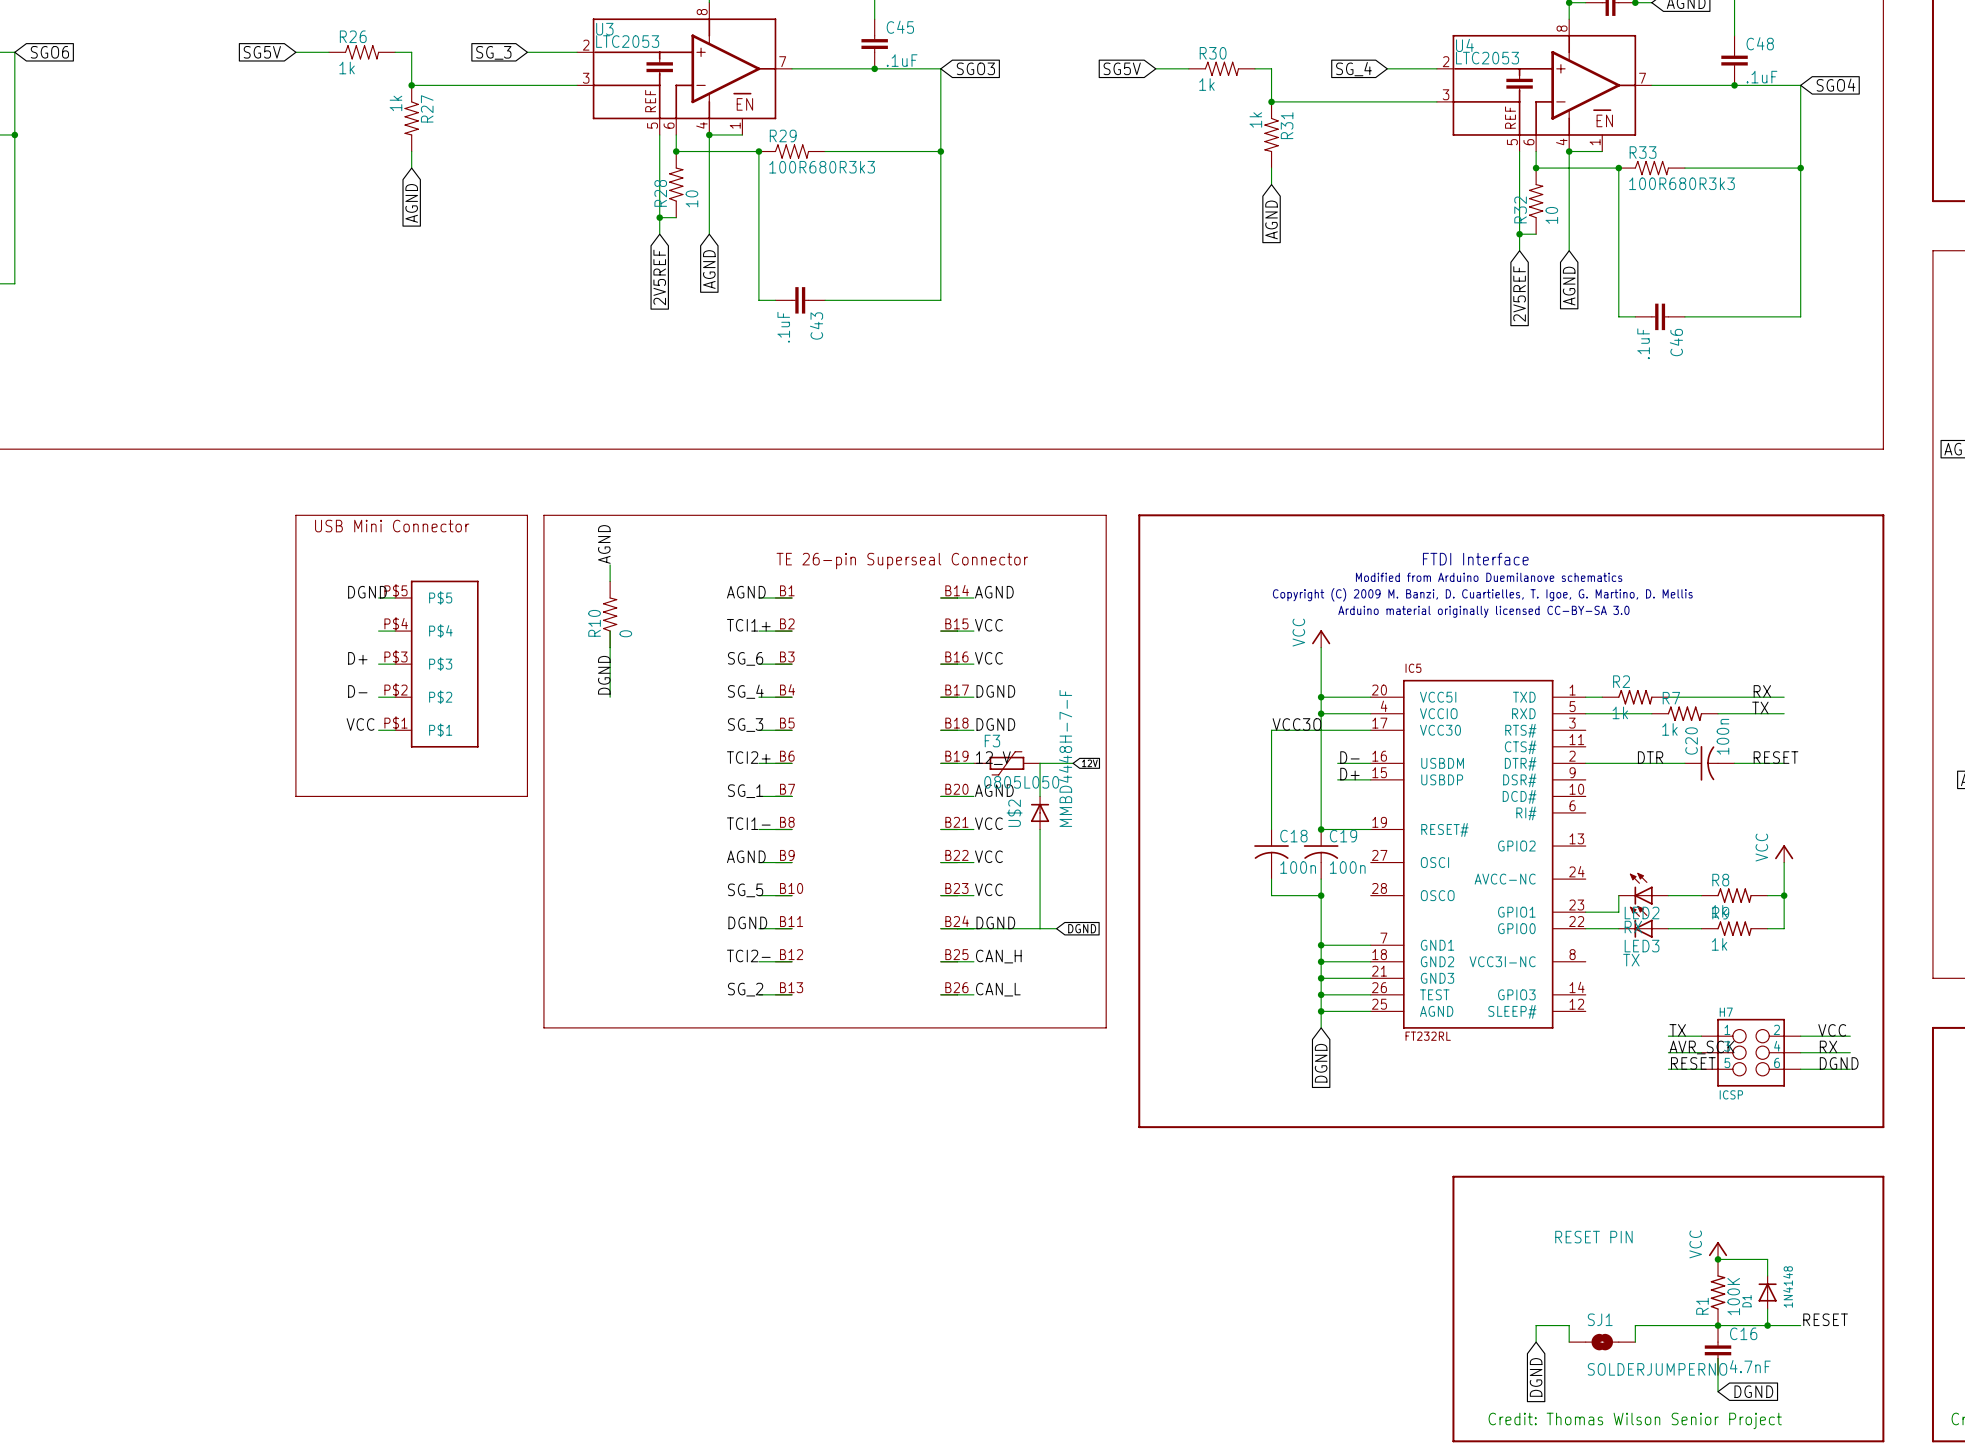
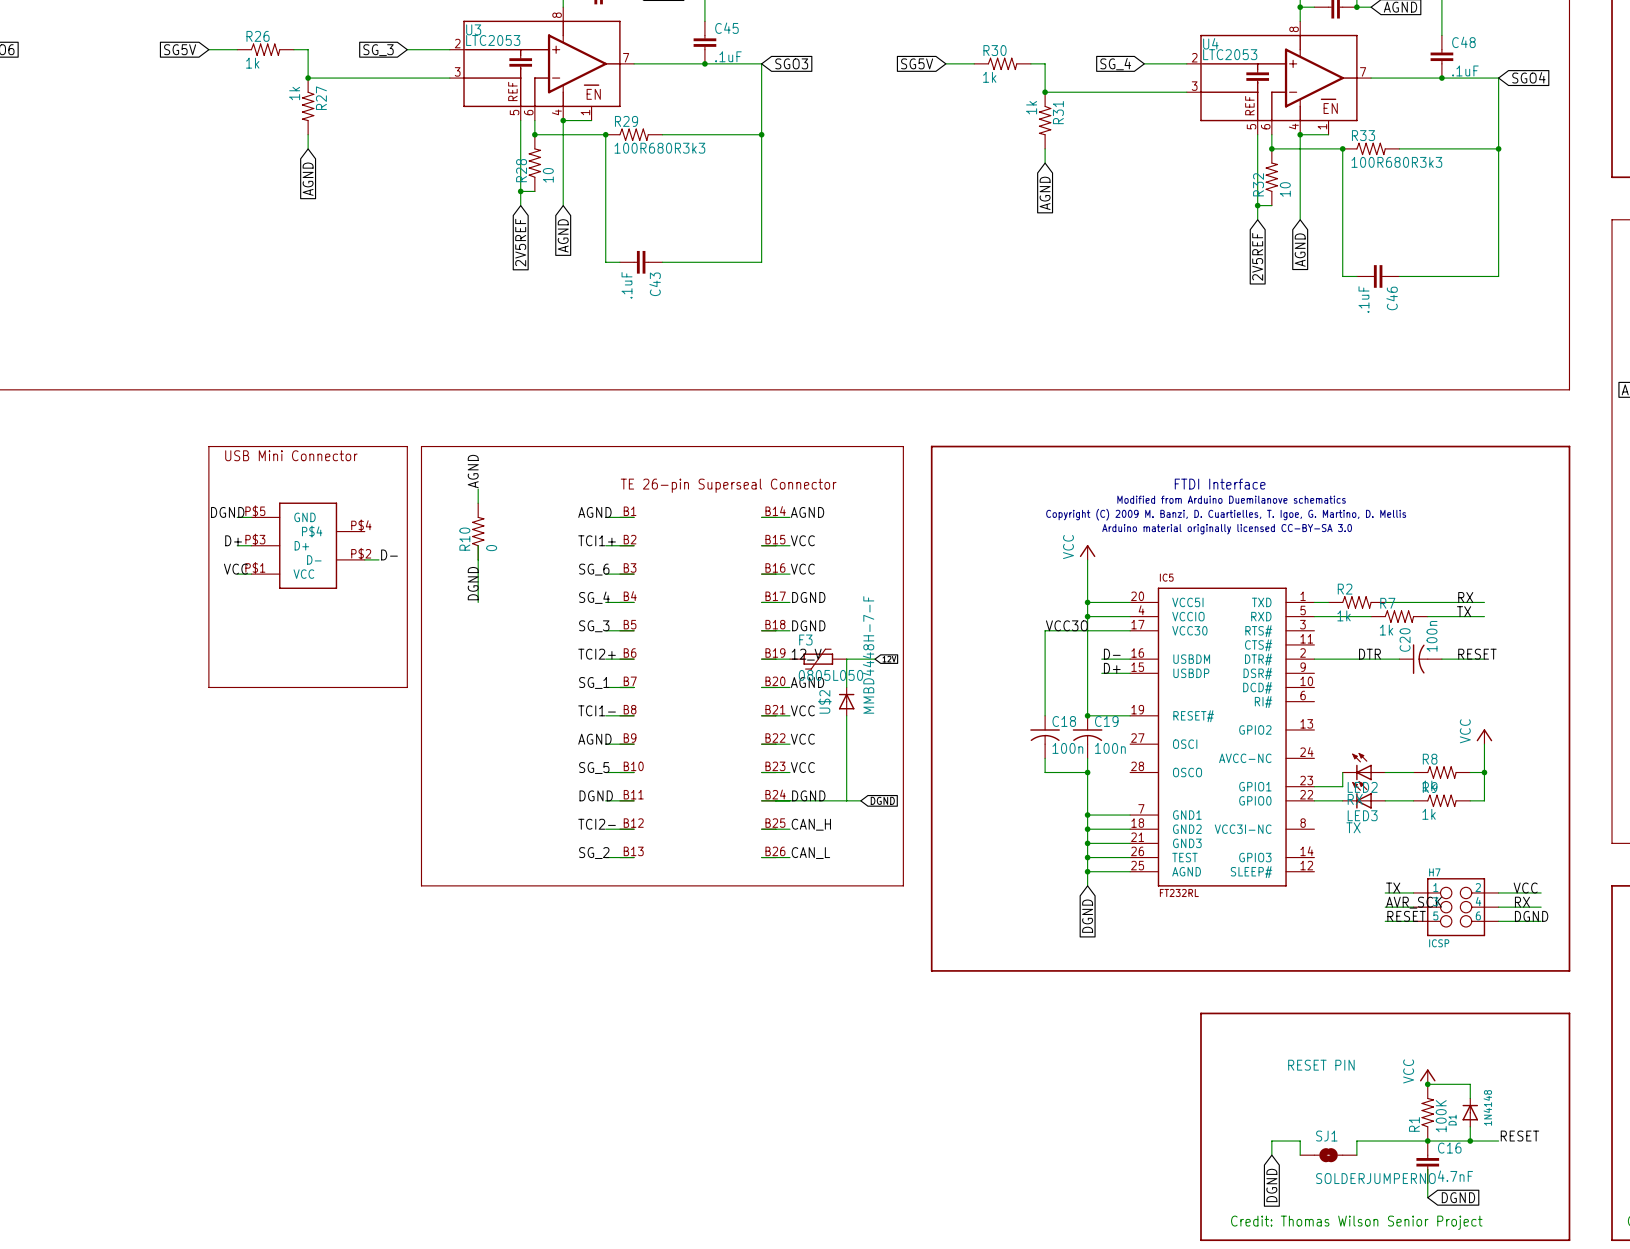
label position: DGND (367, 592) -> DGND (227, 512)
wire: (378, 597) (395, 597) -> (237, 517) (251, 517)
wire: (378, 631) (395, 631) -> (237, 545) (251, 545)
part: none -> (308, 545)
label position: D+ (357, 658) -> D+ (233, 540)
wire: (378, 664) (395, 664) -> (237, 574) (251, 574)
part: (436, 664) -> none
label position: D- (357, 691) -> D- (389, 554)
wire: (378, 697) (395, 697) -> (364, 559) (378, 559)
label position: VCC (360, 724) -> VCC (235, 569)
wire: (378, 730) (395, 730) -> none

